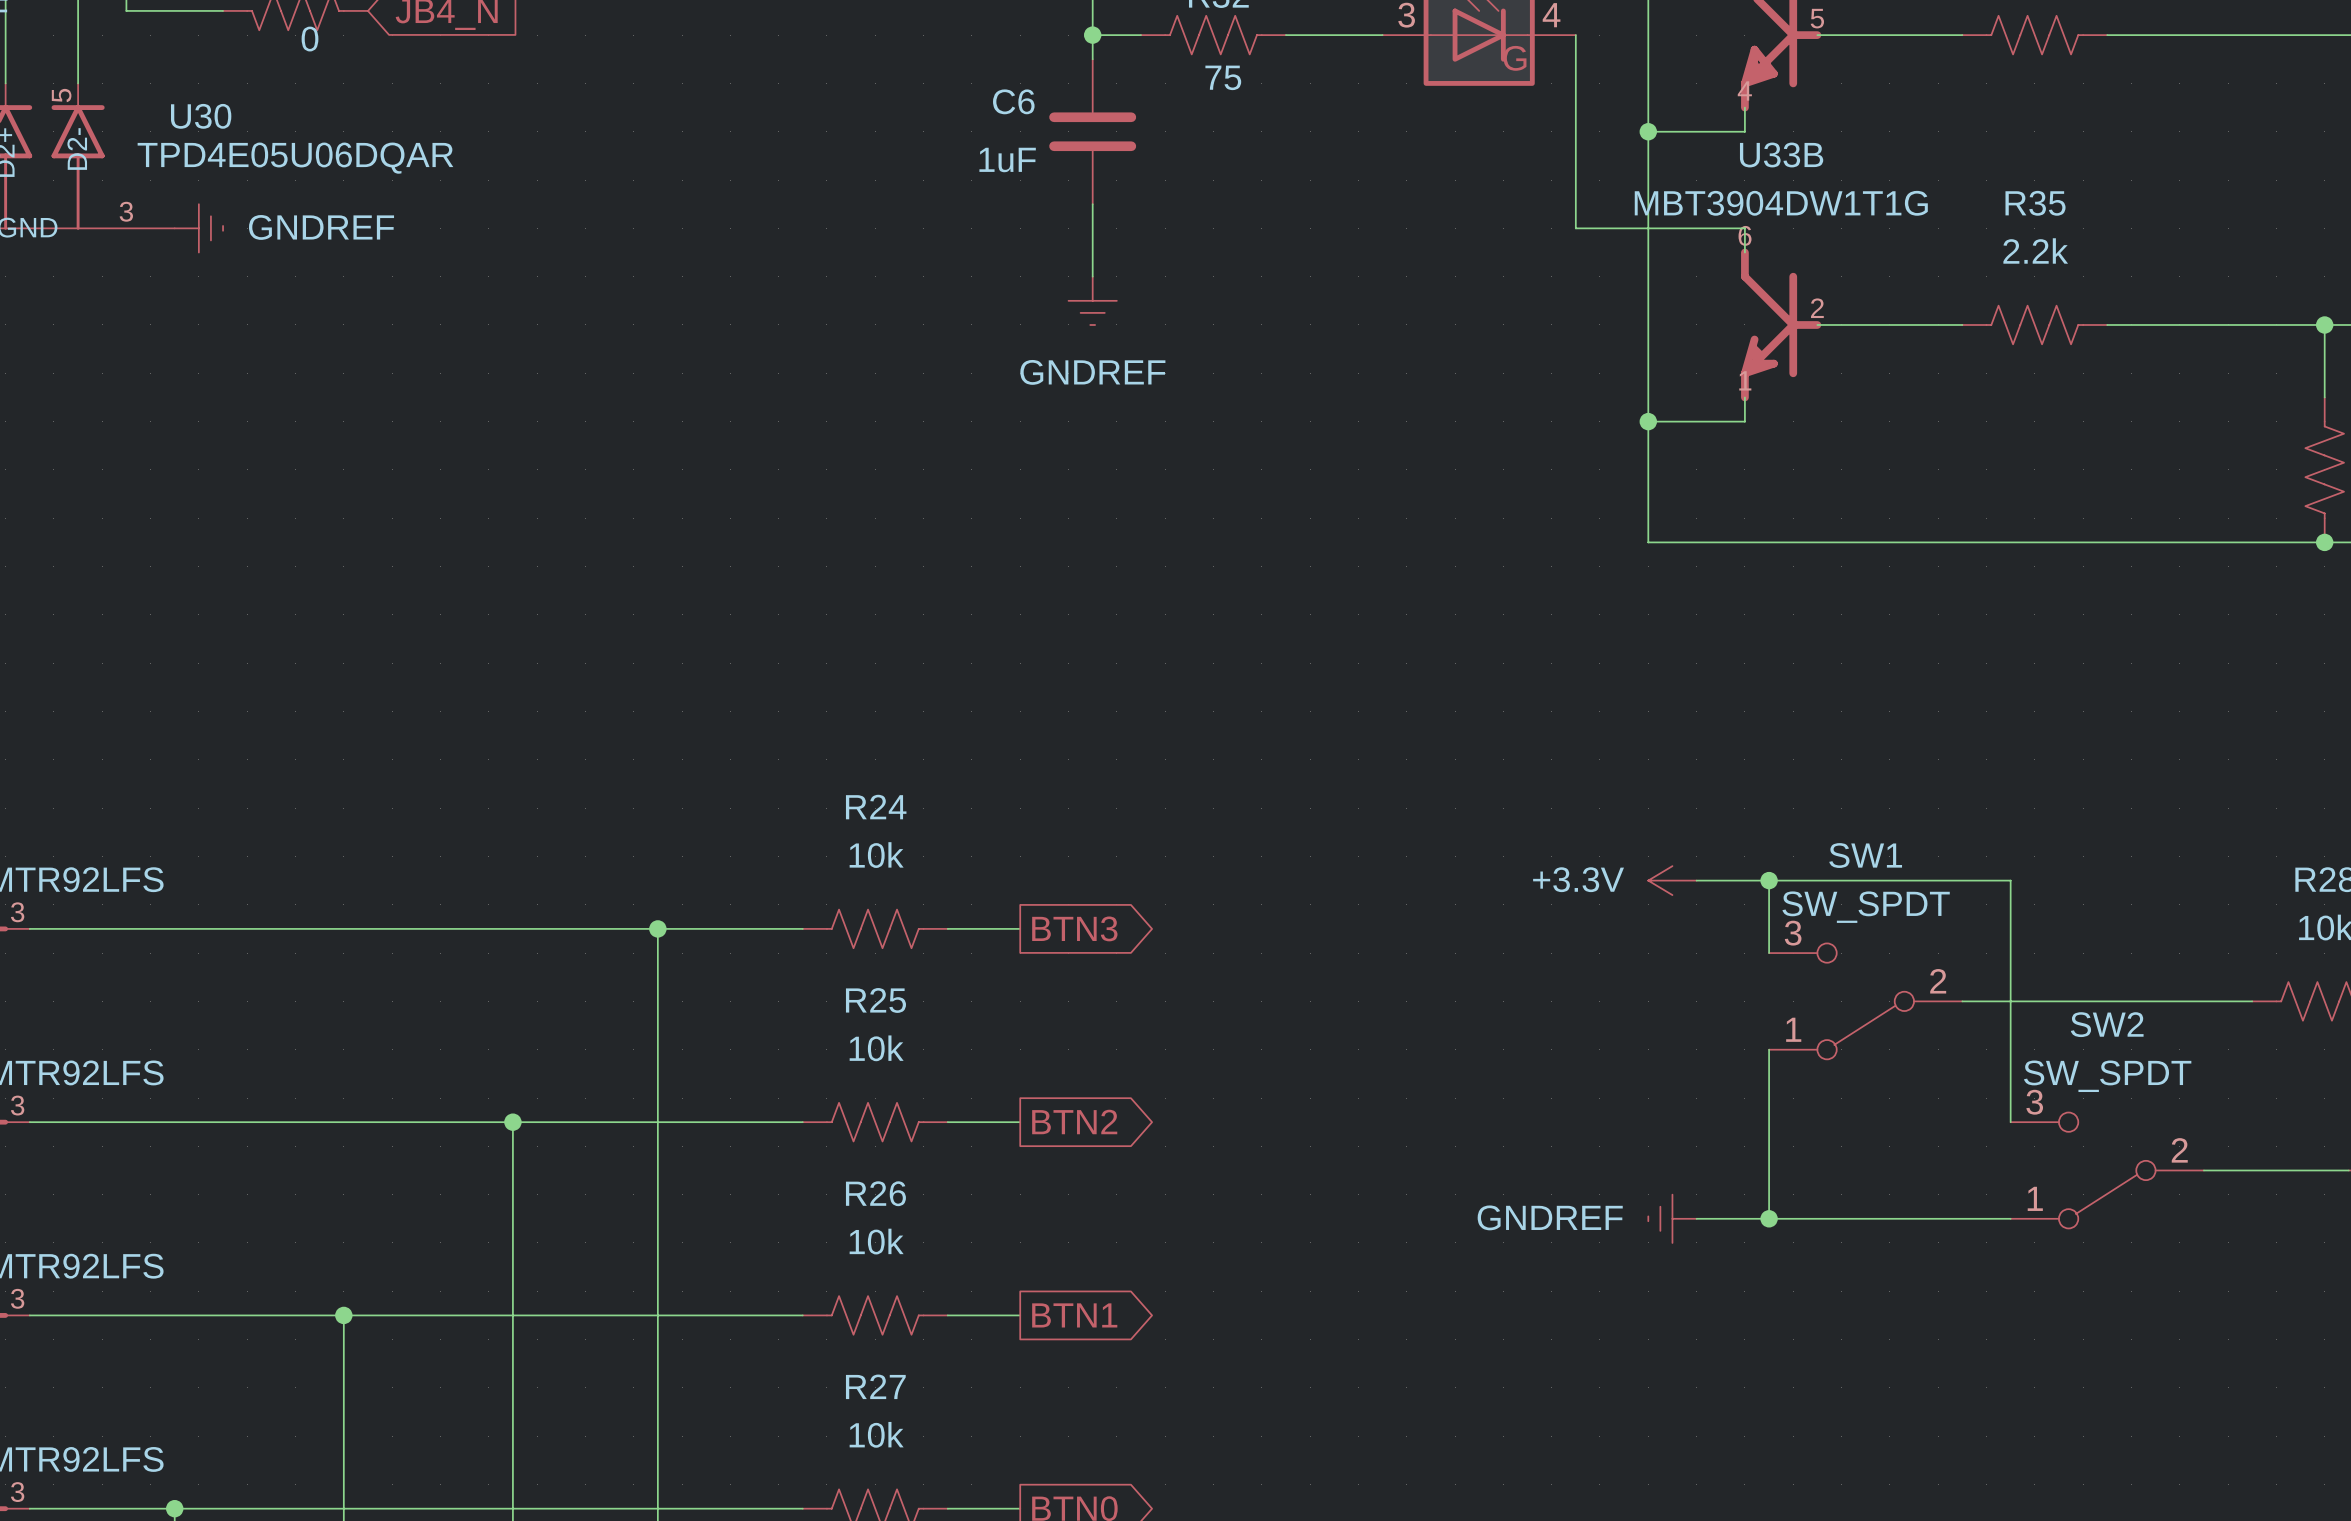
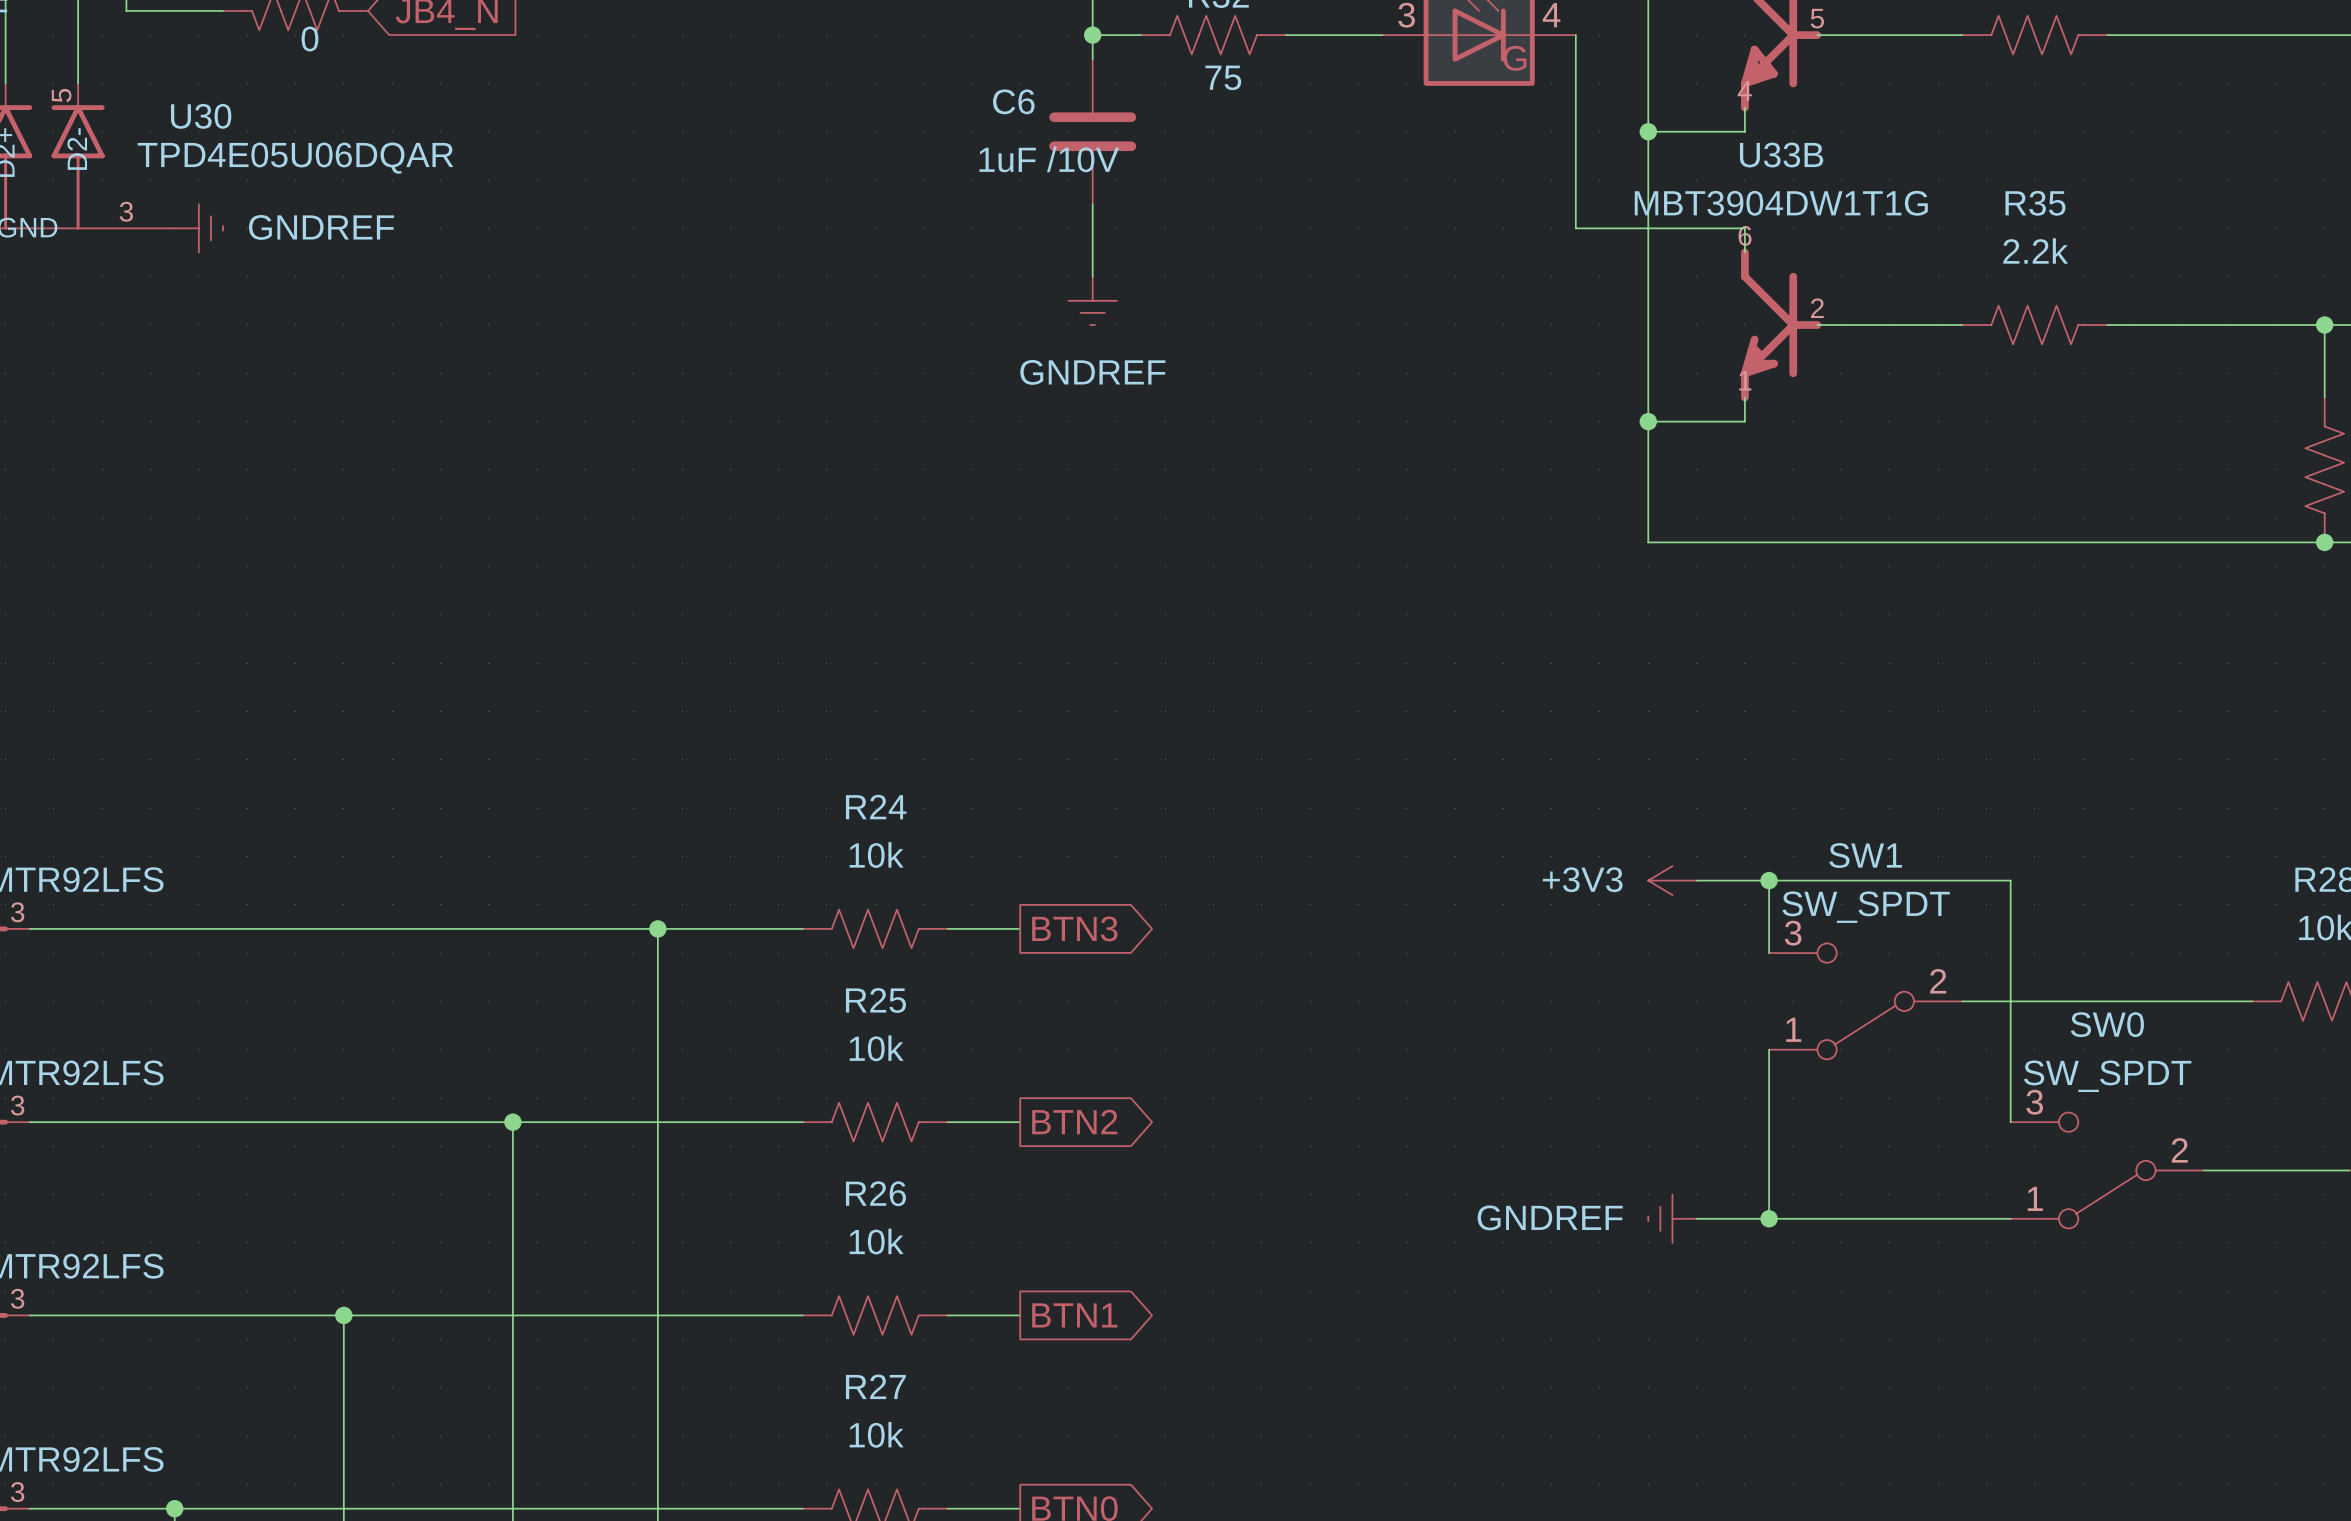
C6 value: 1uF (1007, 159) -> 1uF /10V (1049, 159)
power symbol: +3.3V (1672, 880) -> +3V3 (1672, 880)
SW2 name: SW2 (2107, 1024) -> SW0 (2107, 1024)

